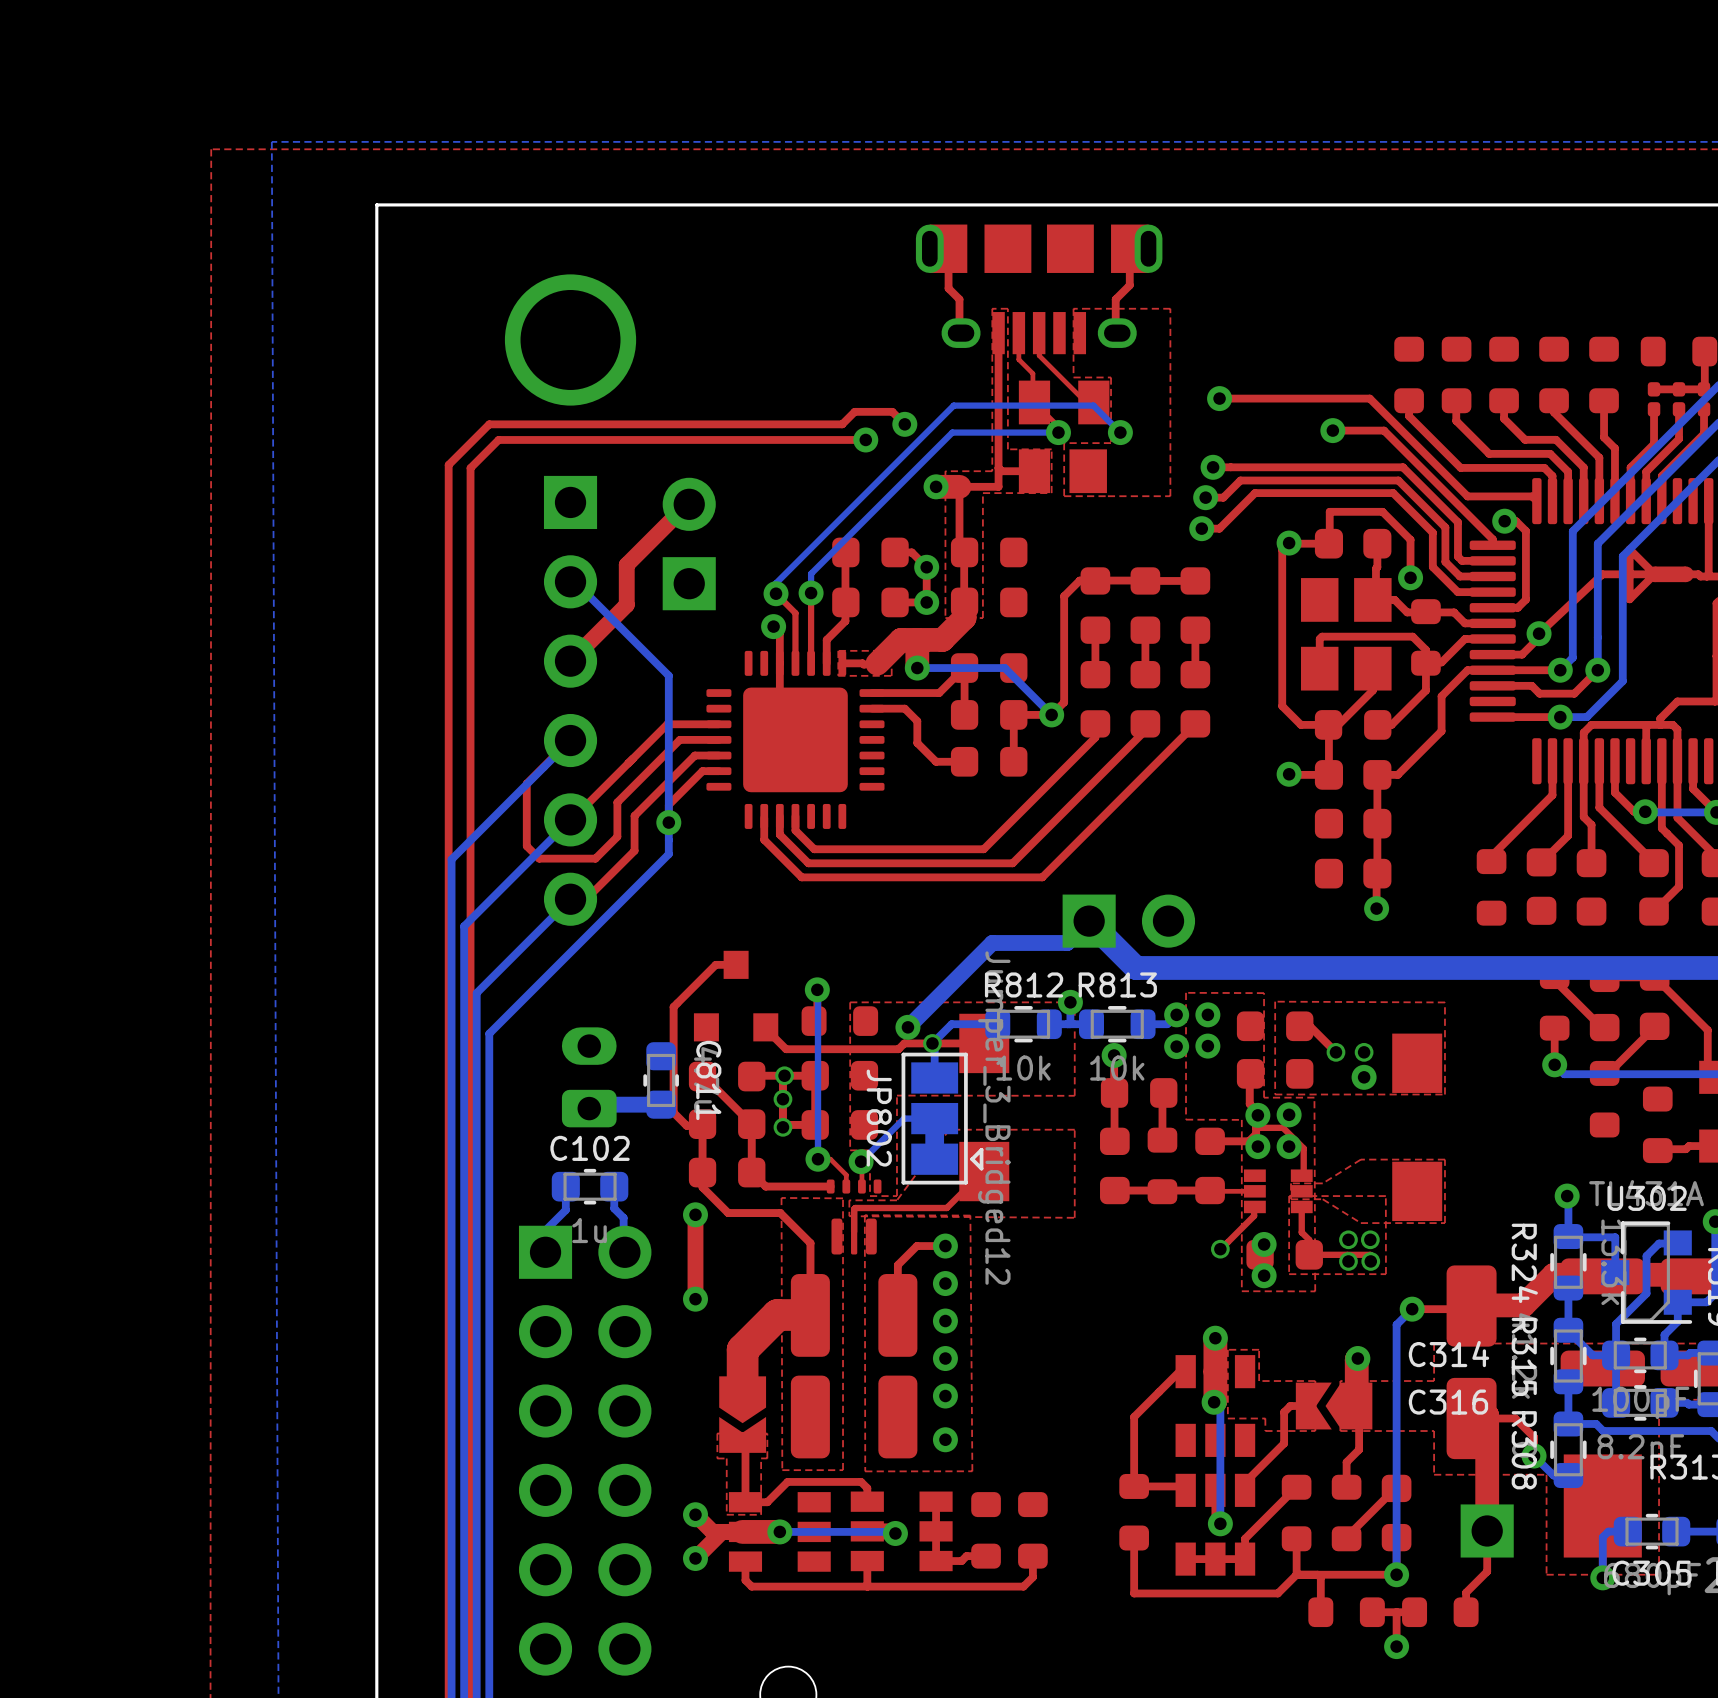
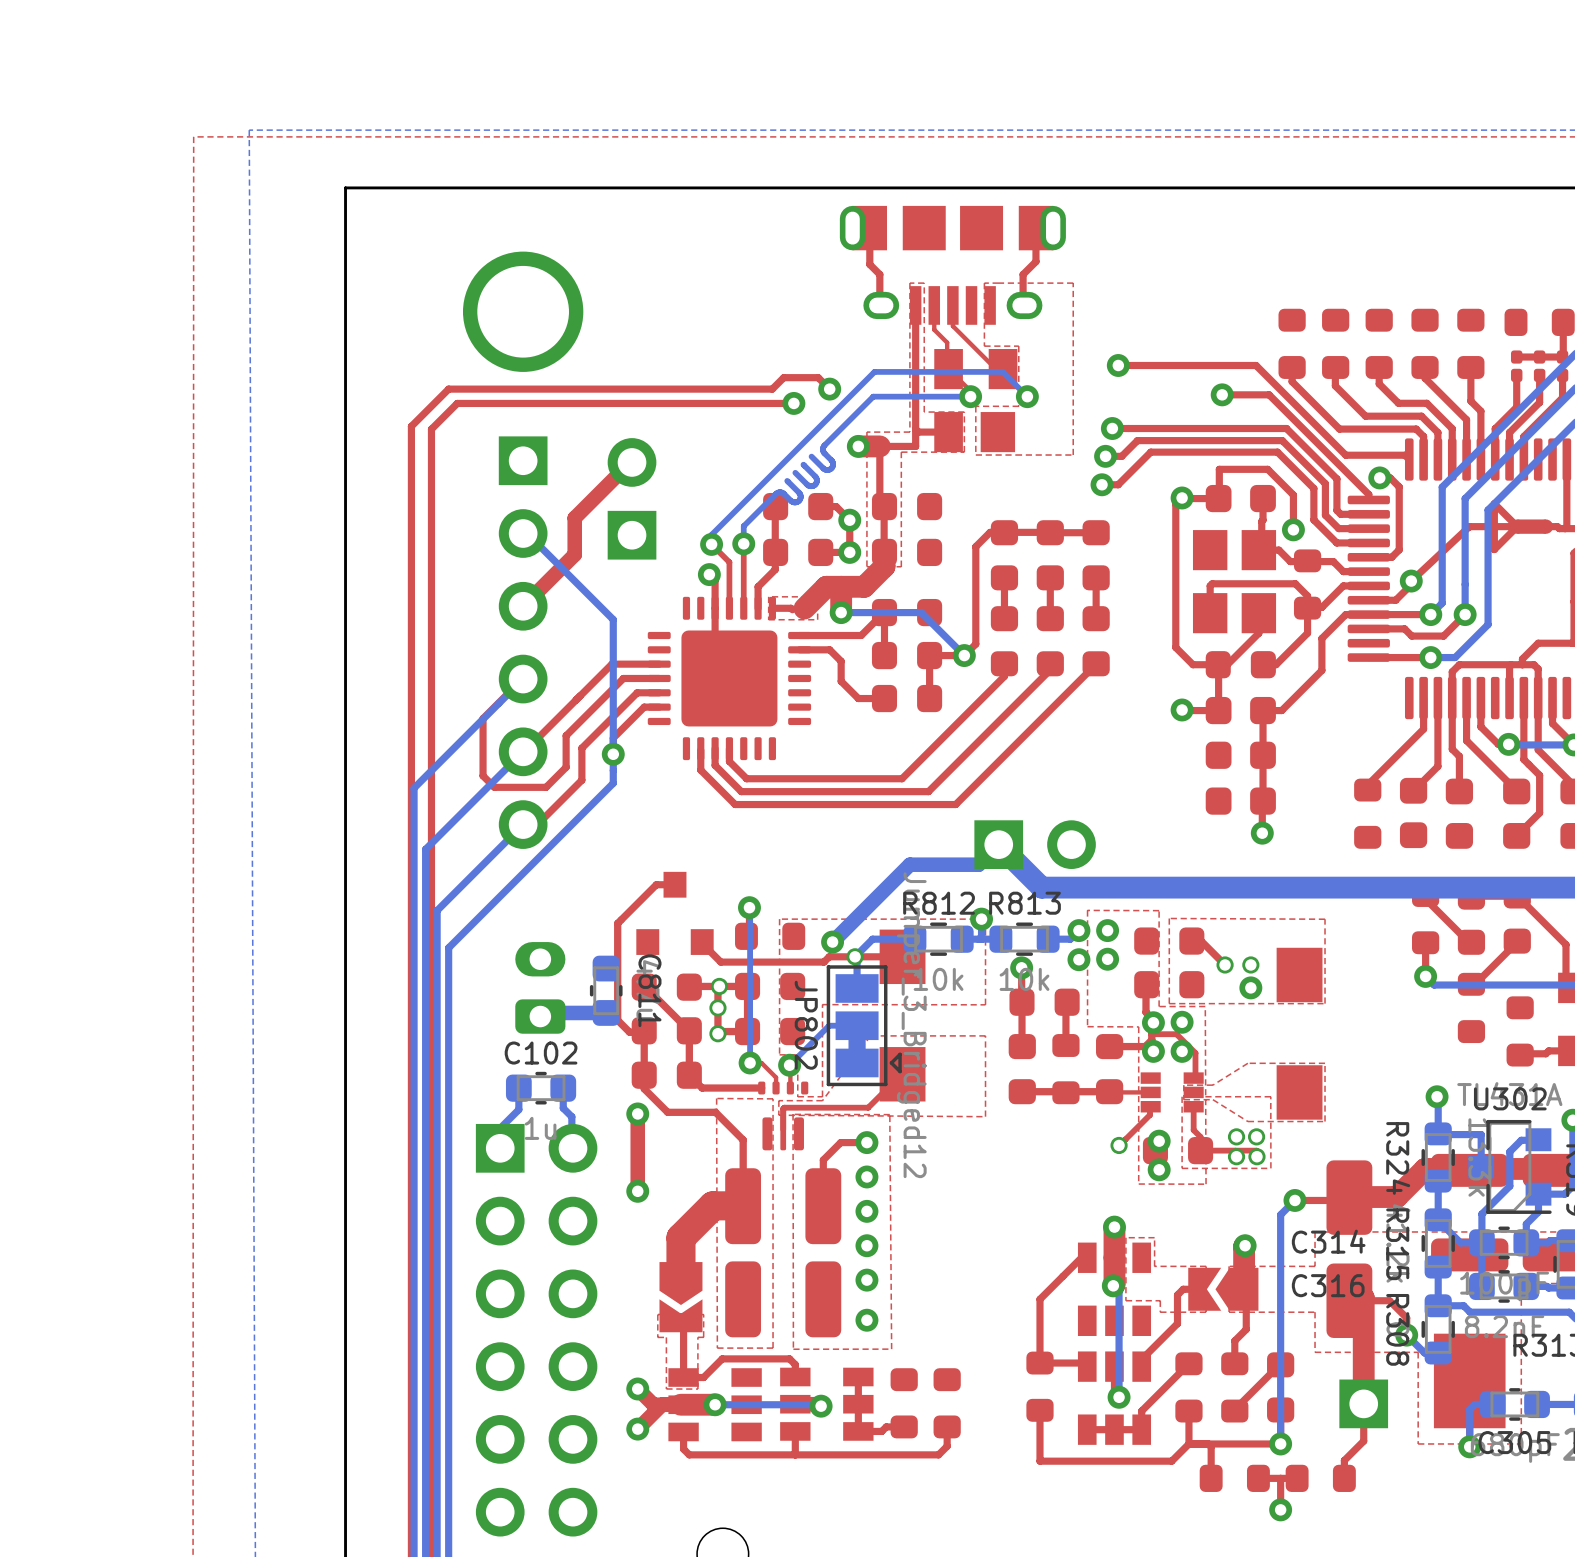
bottom track: (899, 485) (846, 538) -> (787, 480) (799, 493) (799, 500) (793, 502) (781, 492) (775, 493)
bottom track: none -> (824, 445) (823, 451) (832, 462) (831, 468) (824, 469) (811, 456)
bottom track: none -> (803, 464) (816, 477) (815, 484) (808, 485) (795, 472)

